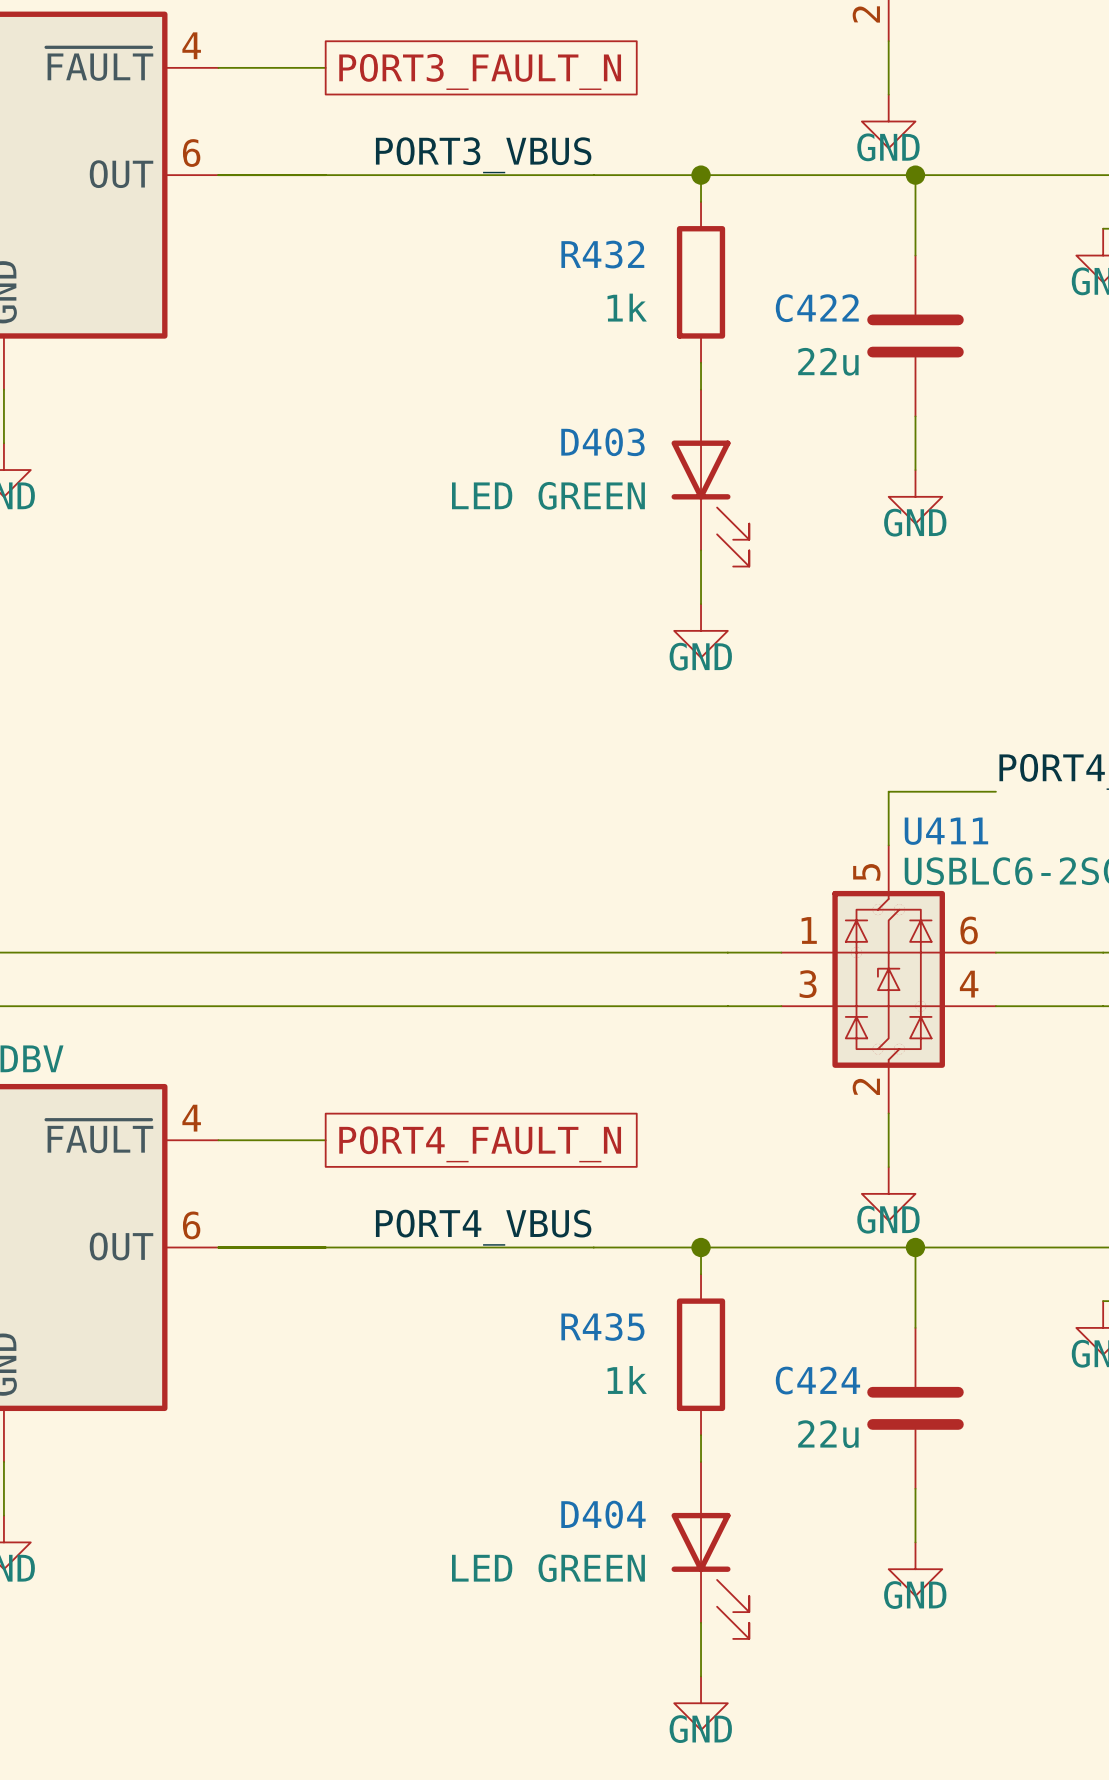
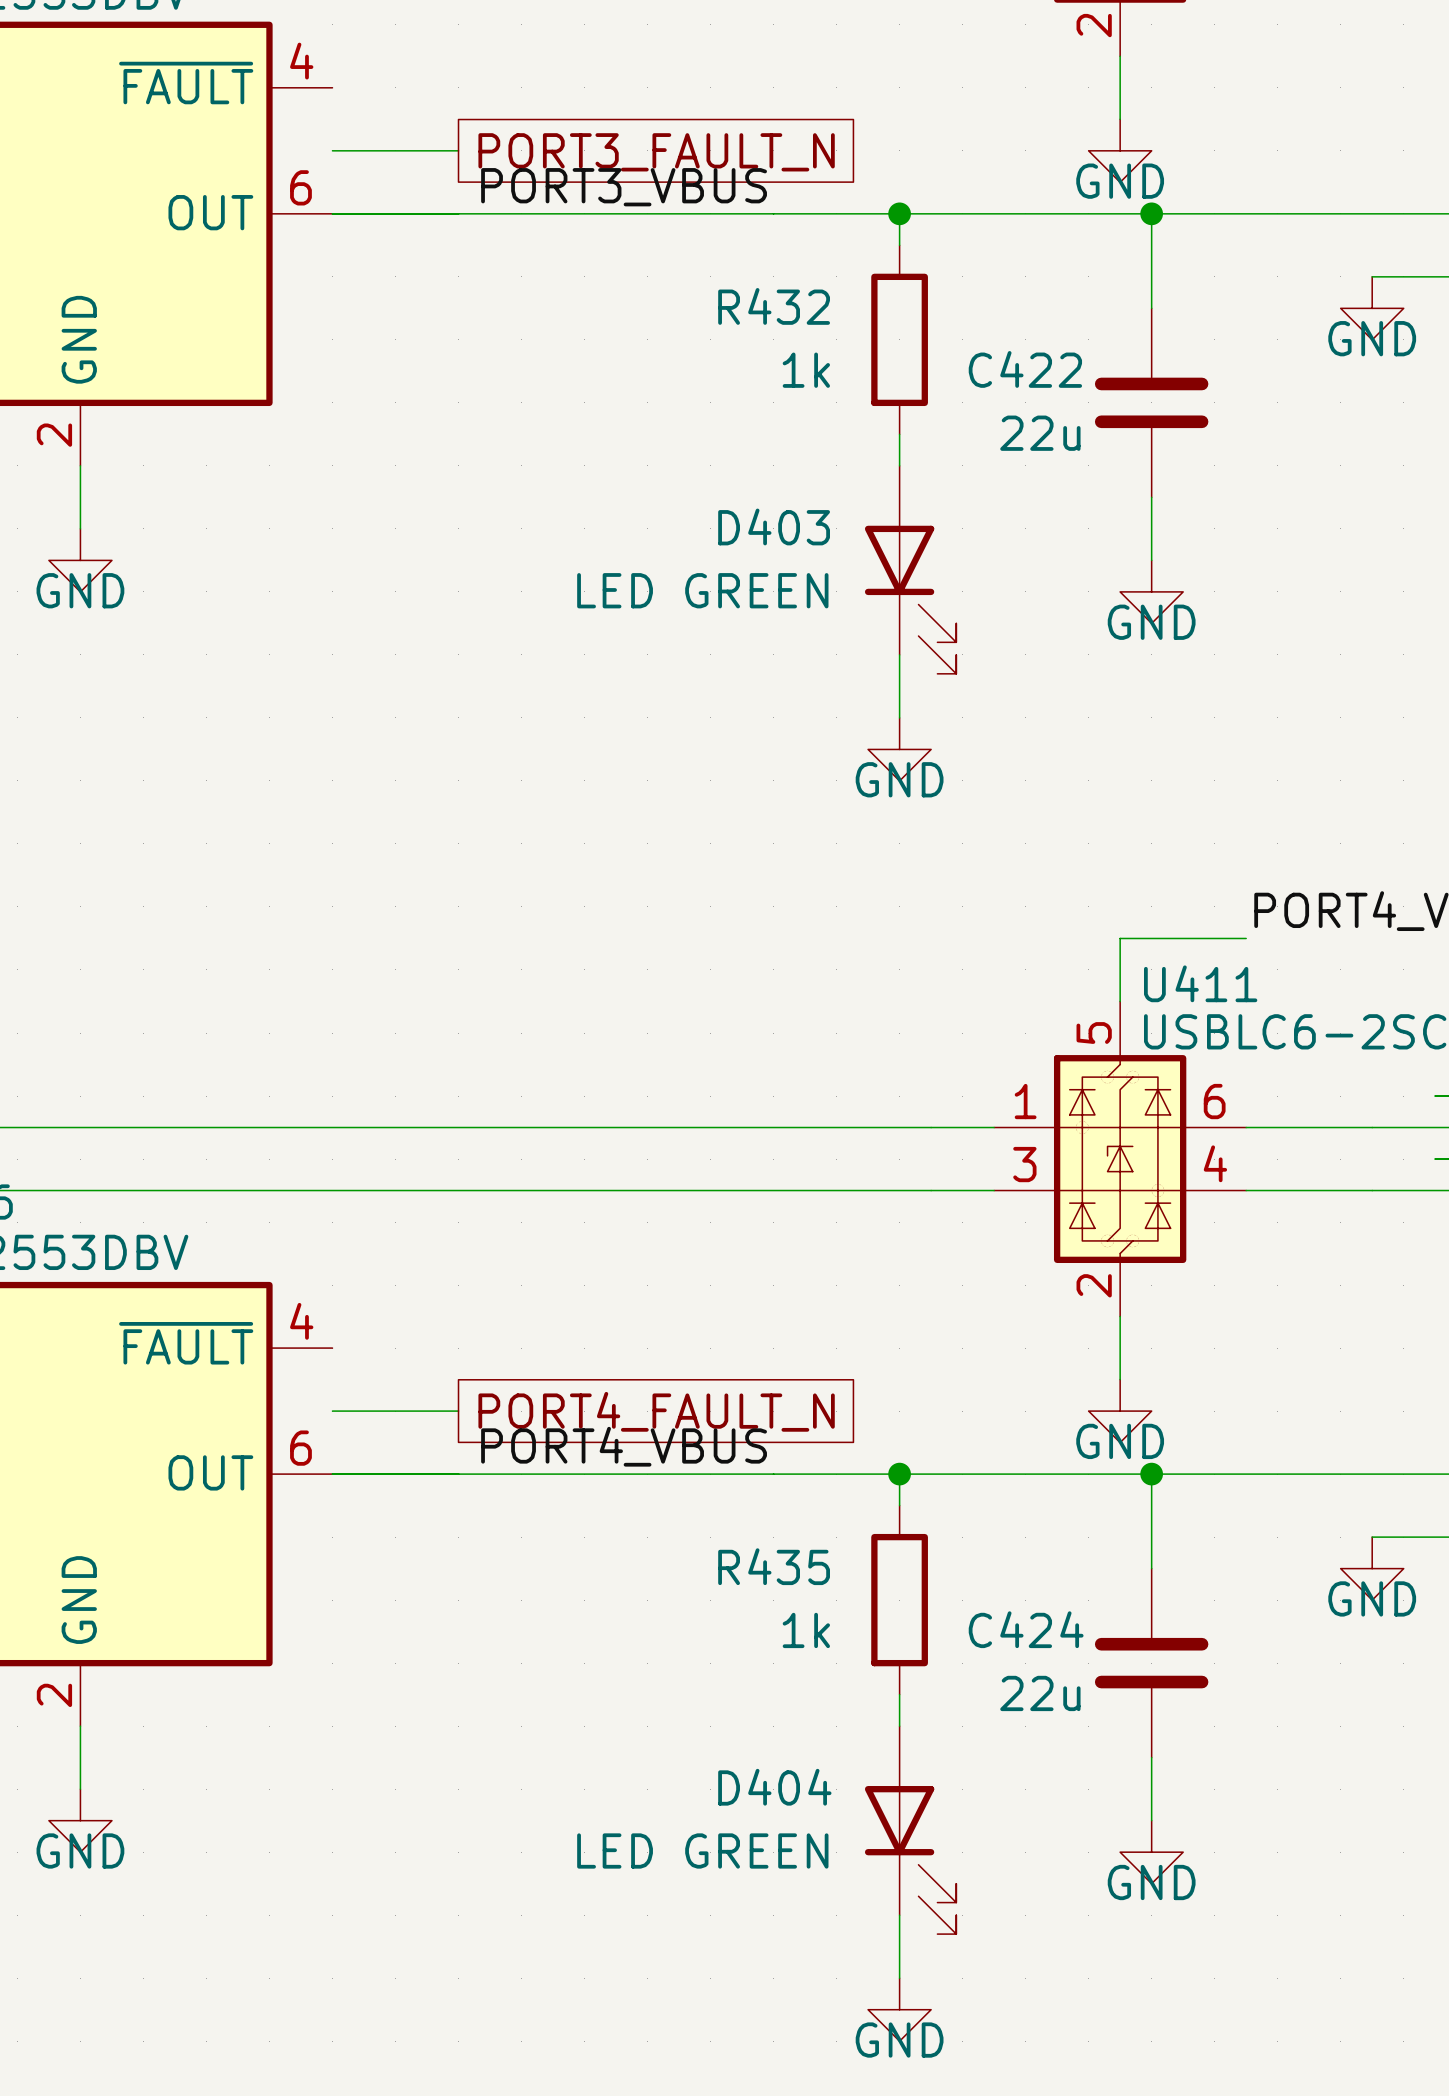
wire: (218, 67) (325, 67) -> (332, 150) (458, 150)
global label position: PORT3_FAULT_N (480, 71) -> PORT3_FAULT_N (656, 152)
wire: (218, 1140) (325, 1140) -> (332, 1411) (458, 1411)
global label position: PORT4_FAULT_N (480, 1144) -> PORT4_FAULT_N (656, 1411)

